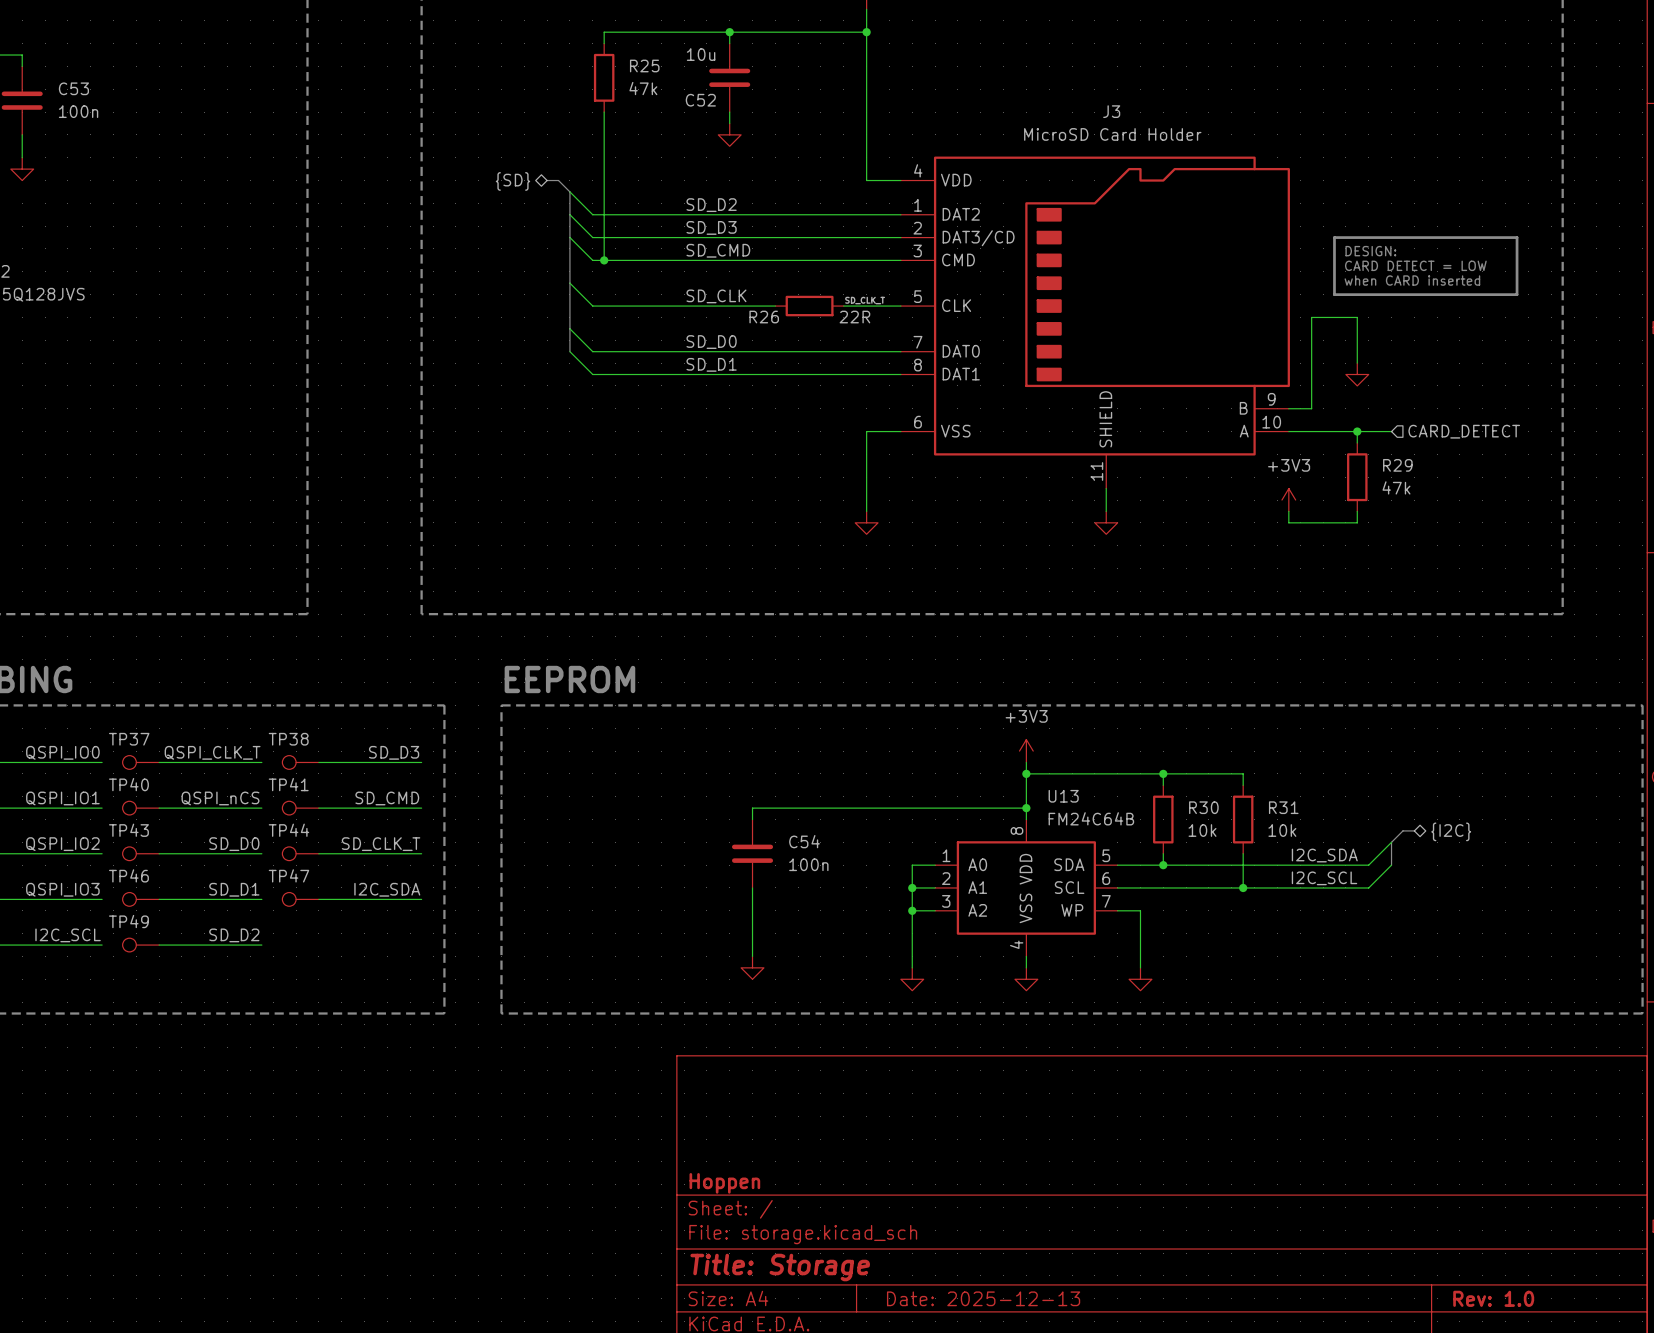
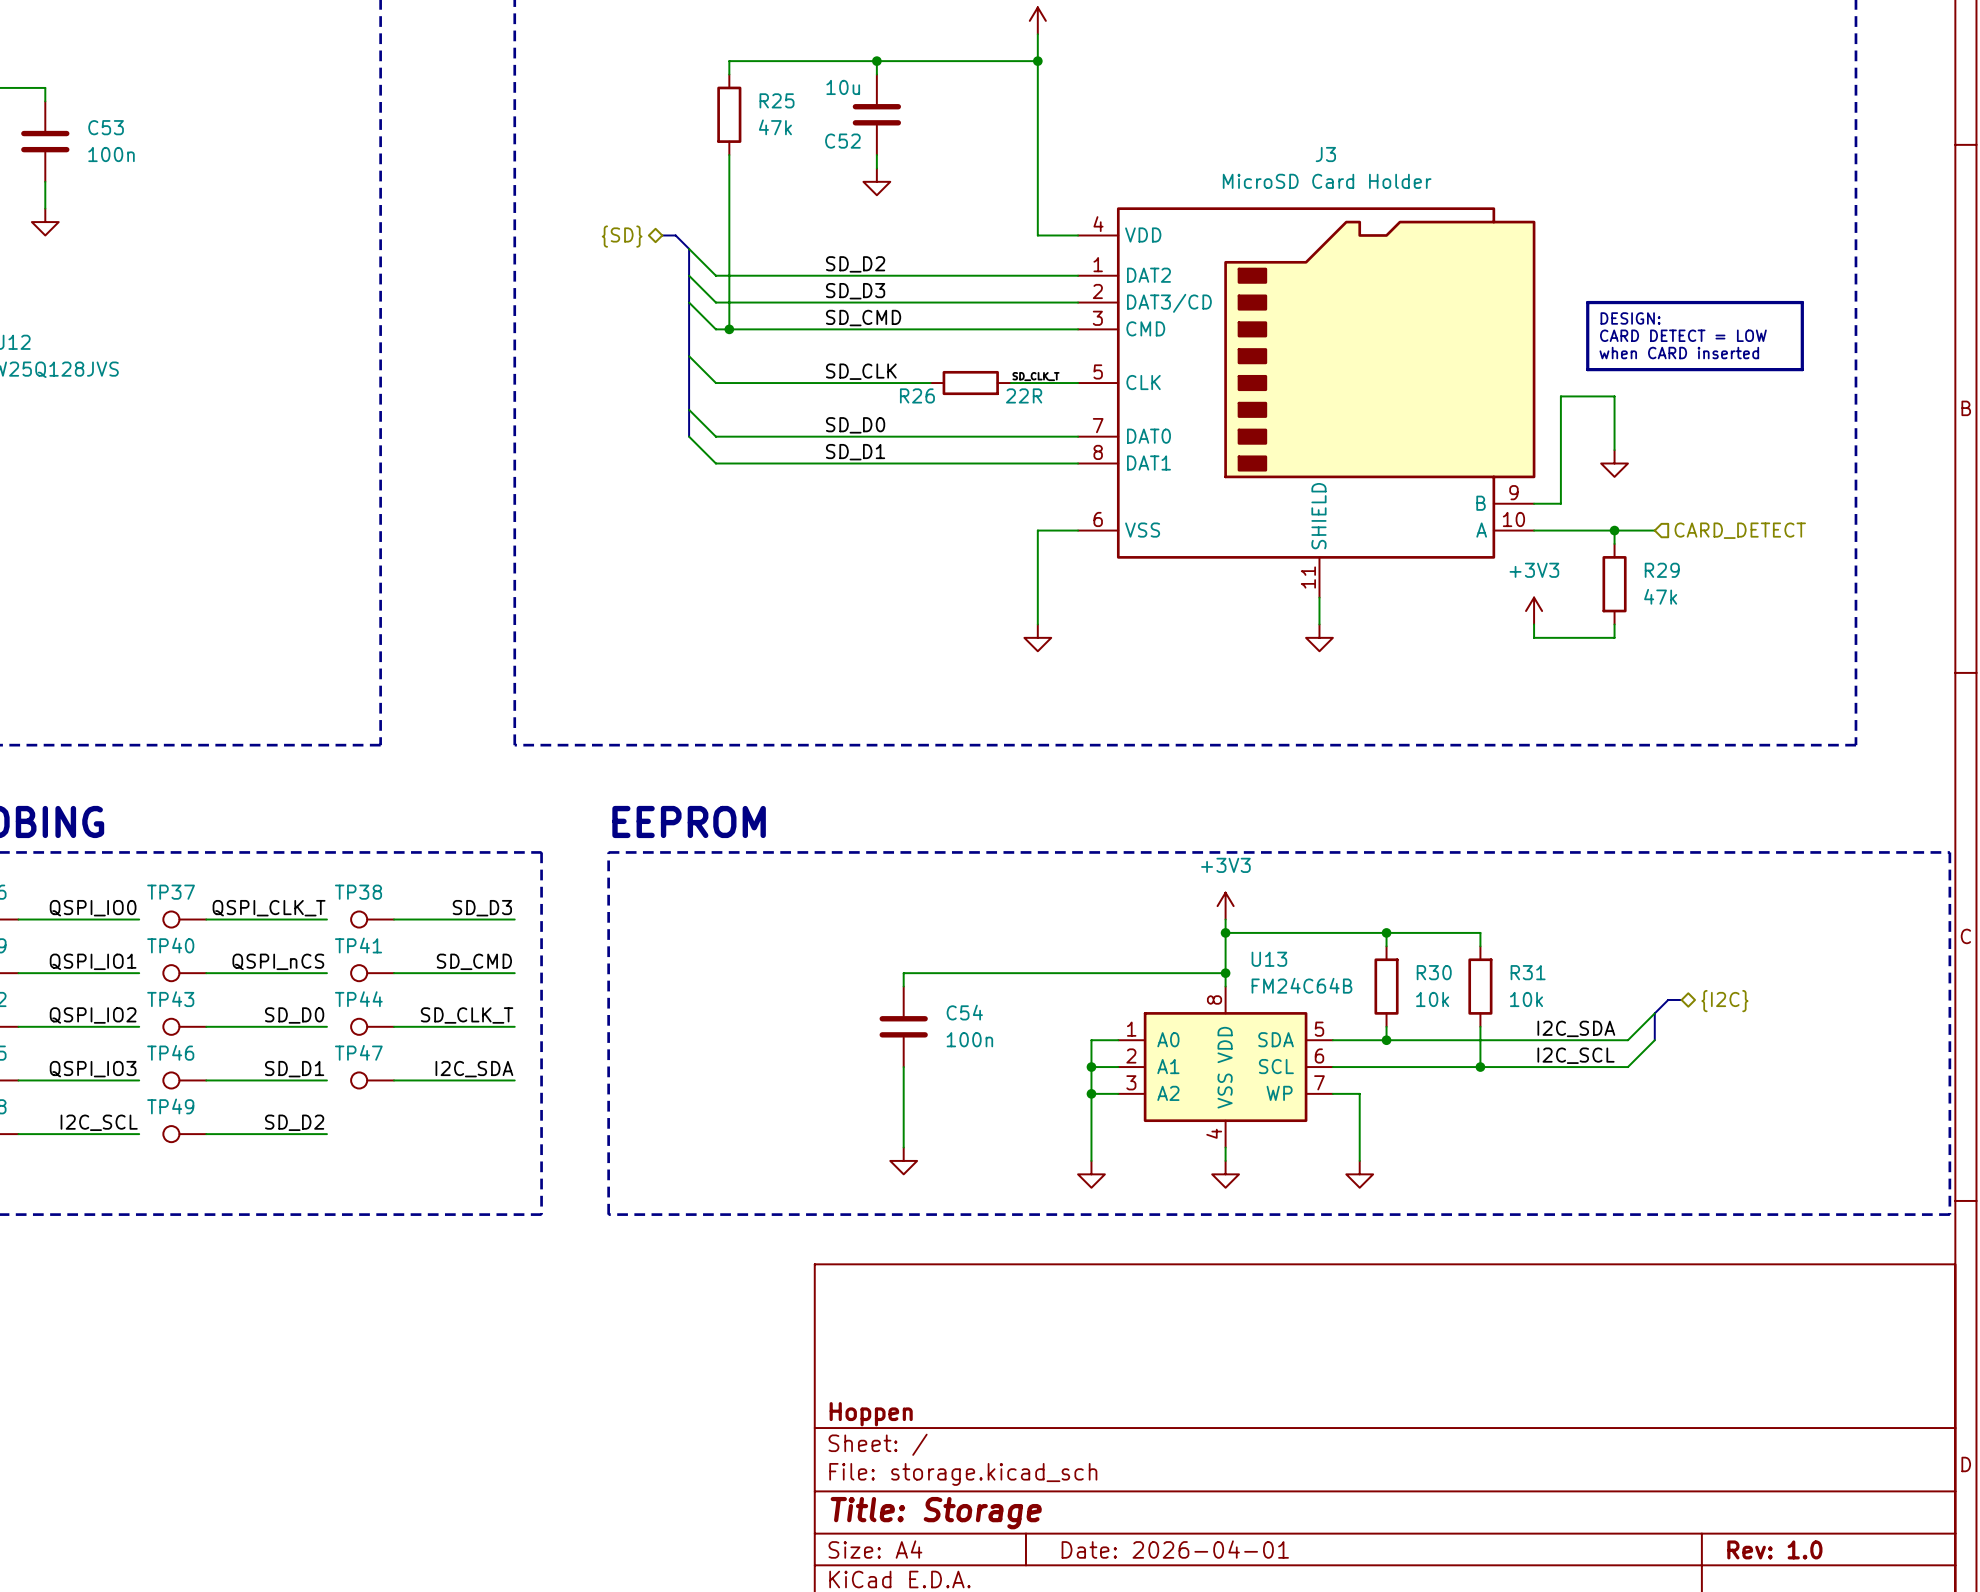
title block: Date: 2025-12-13 (983, 1298) -> Date: 2026-04-01 (1175, 1549)

